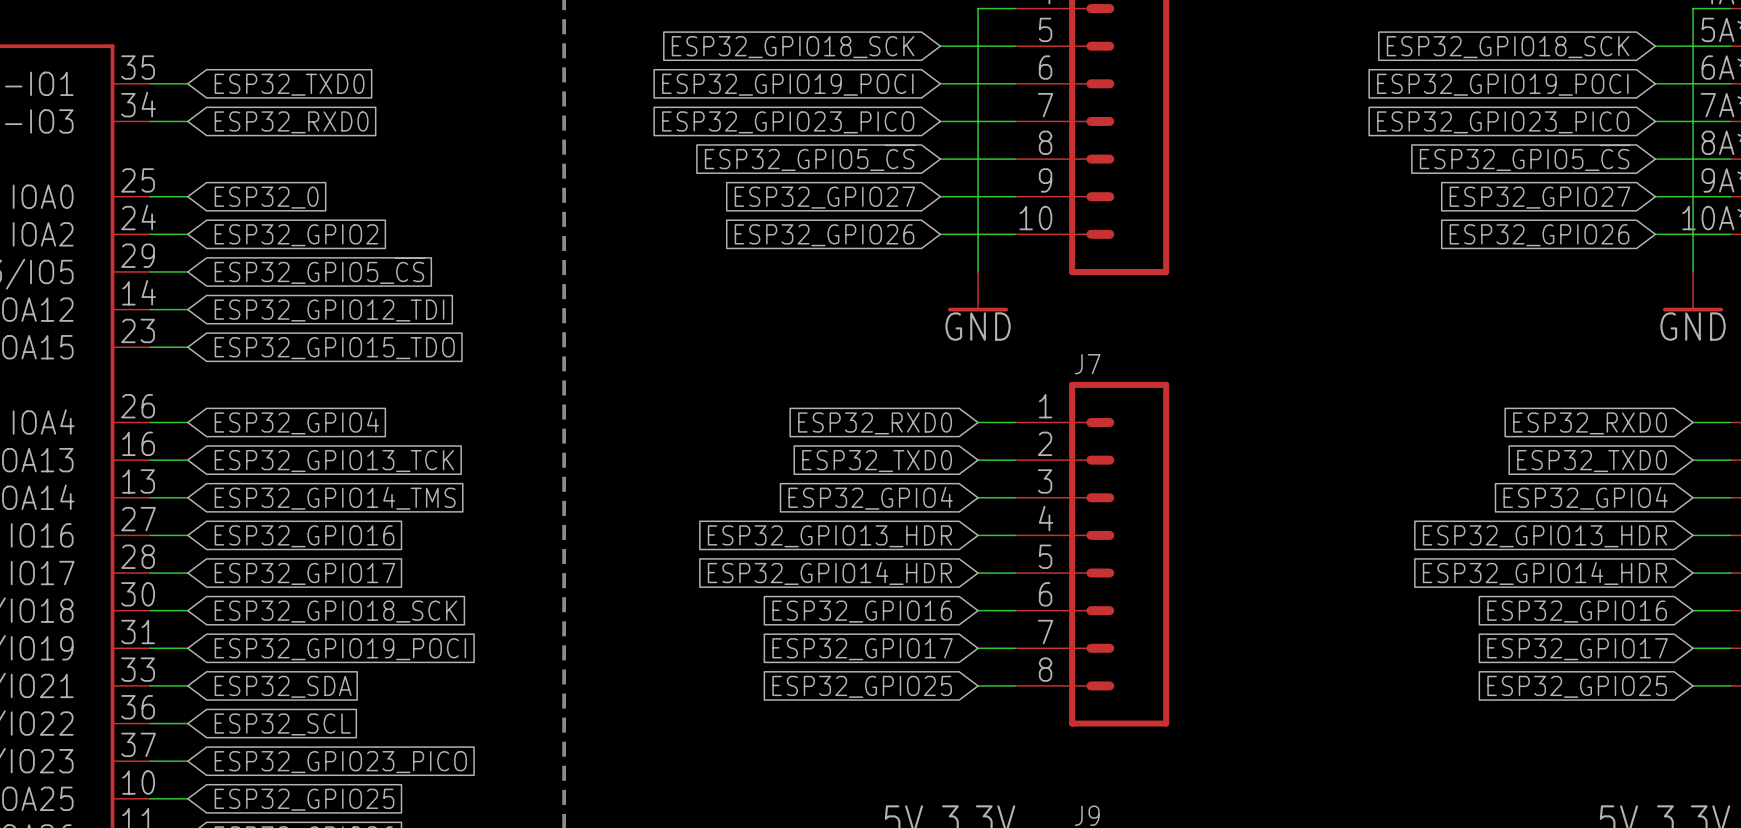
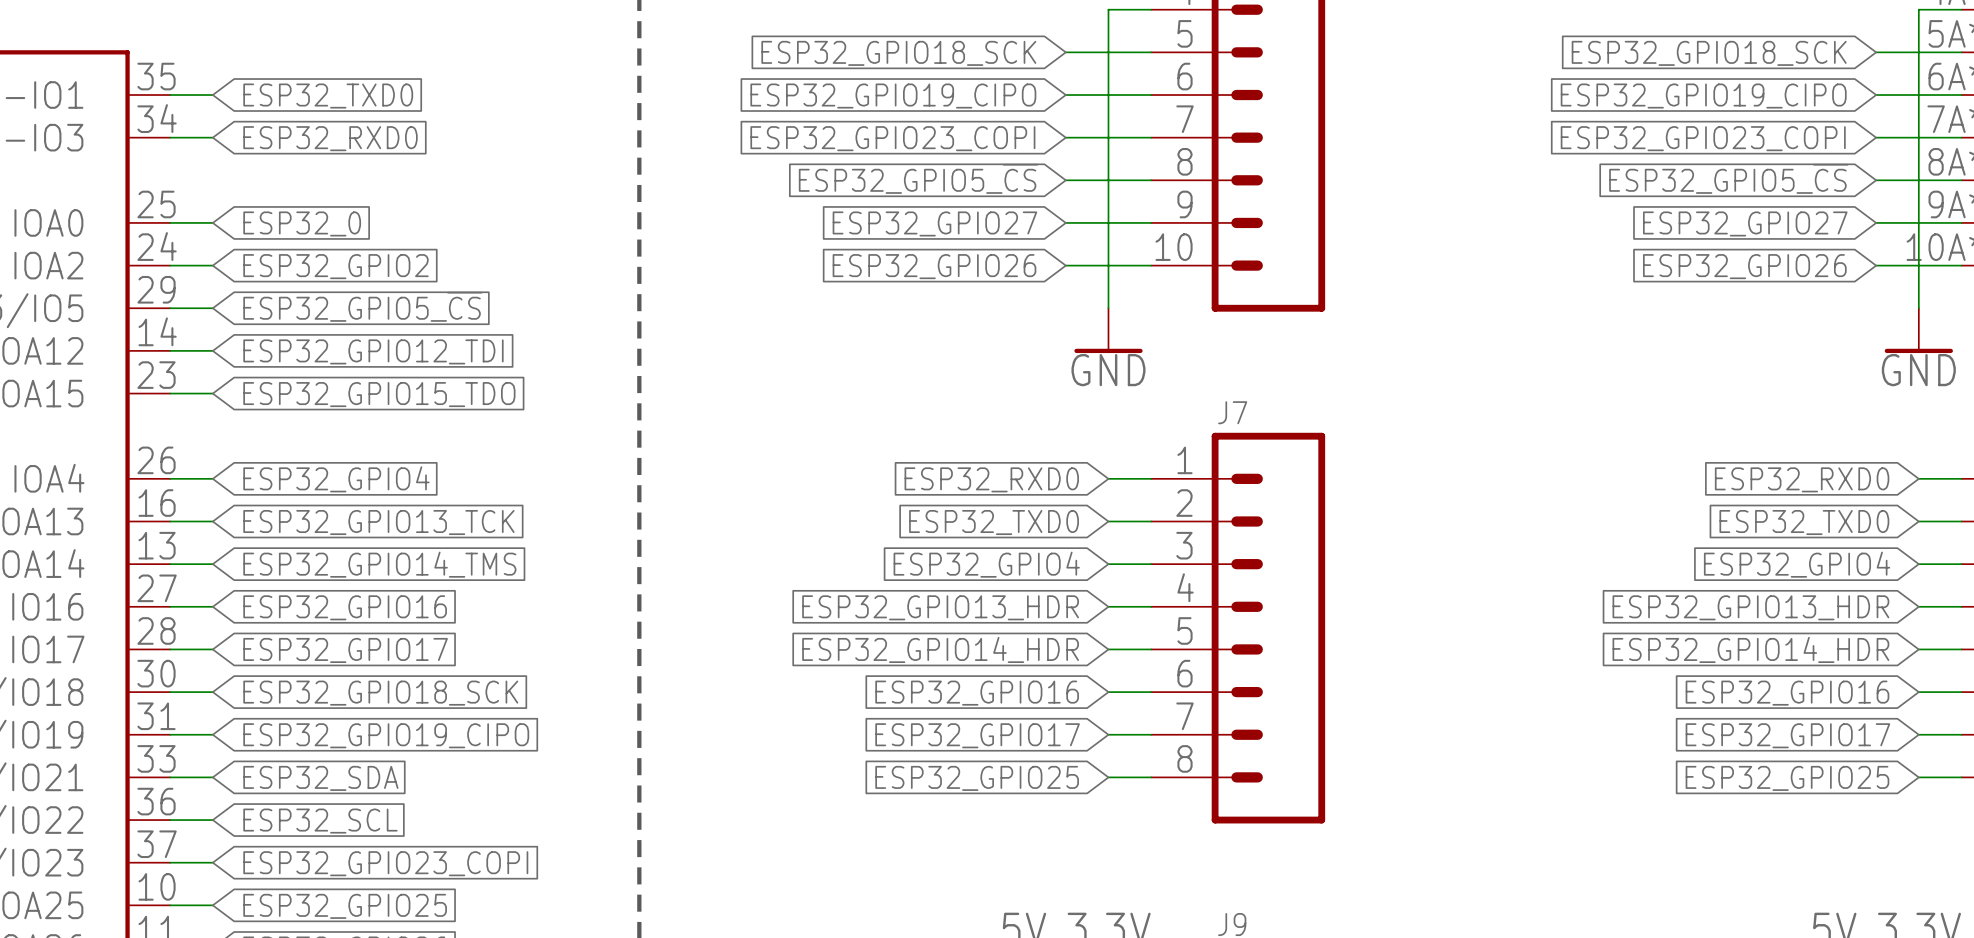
global label: ESP32_GPIO19_POCI (787, 84) -> ESP32_GPIO19_CIPO (893, 96)
global label: ESP32_GPIO19_POCI (1502, 84) -> ESP32_GPIO19_CIPO (1703, 96)
global label: ESP32_GPIO23_PICO (788, 122) -> ESP32_GPIO23_COPI (892, 138)
global label: ESP32_GPIO23_PICO (1503, 122) -> ESP32_GPIO23_COPI (1703, 138)
global label: ESP32_GPIO19_POCI (340, 649) -> ESP32_GPIO19_CIPO (386, 735)
global label: ESP32_GPIO23_PICO (340, 762) -> ESP32_GPIO23_COPI (385, 863)

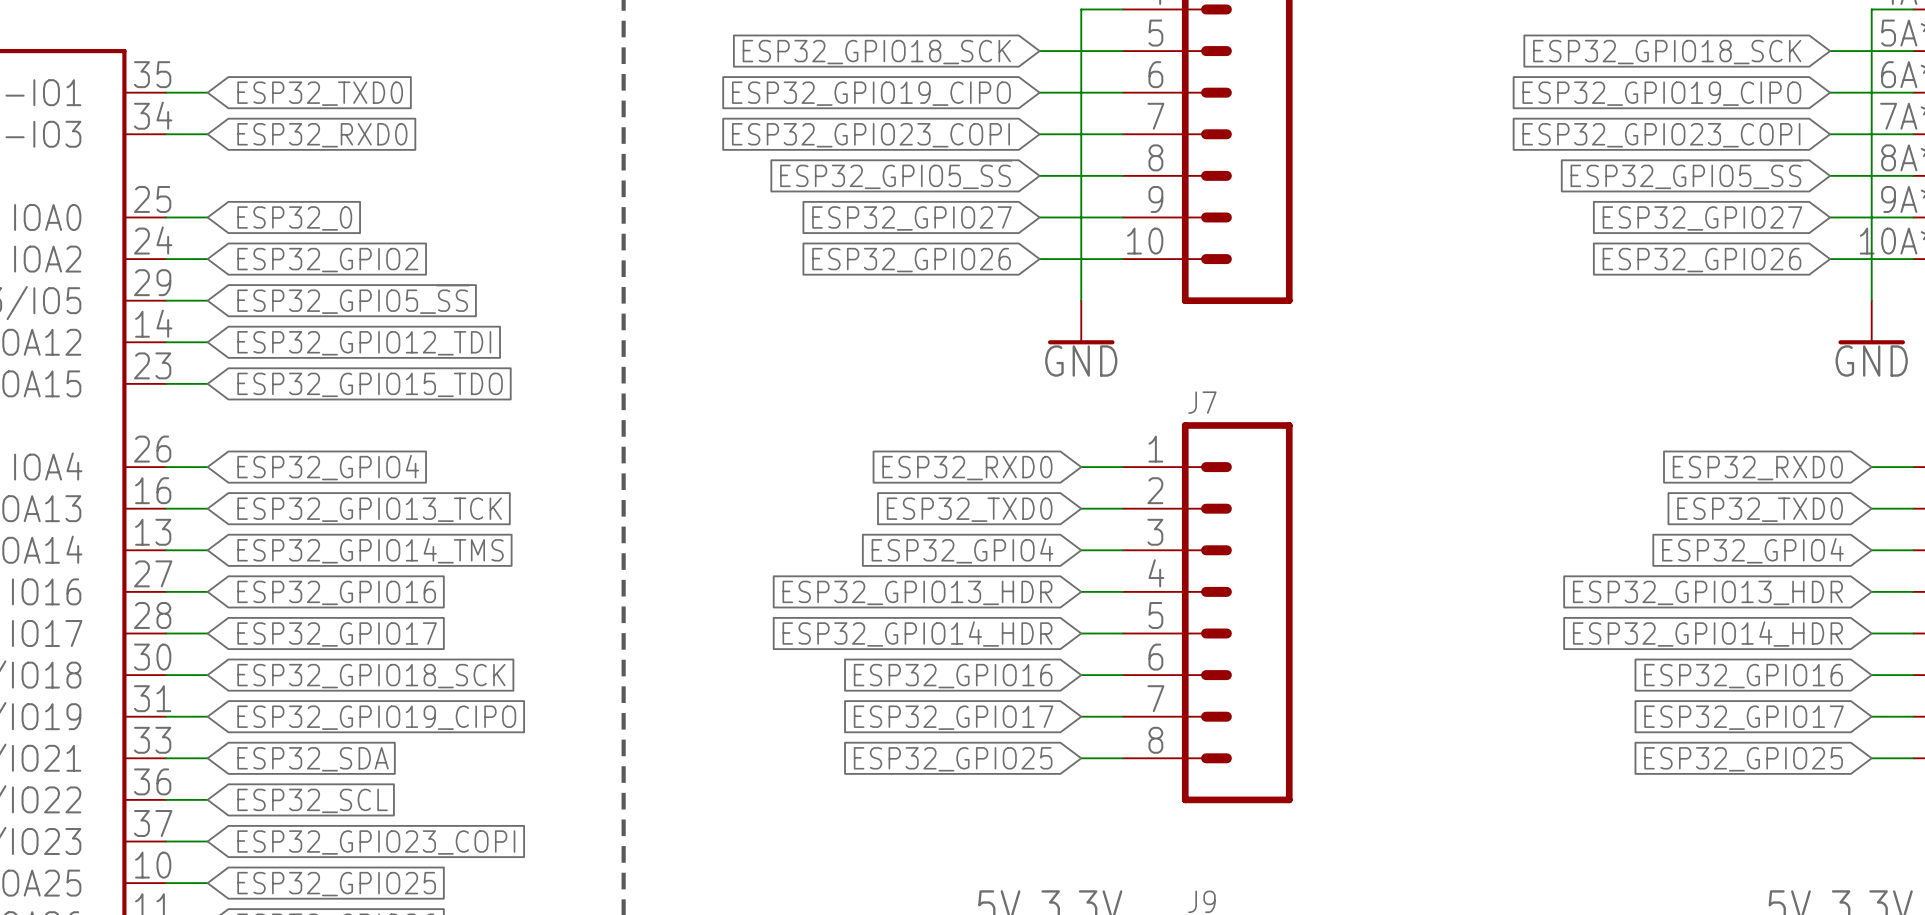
global label: ESP32_GPIO5_~{CS} (918, 178) -> ESP32_GPIO5_~{SS} (896, 174)
global label: ESP32_GPIO5_~{CS} (1728, 178) -> ESP32_GPIO5_~{SS} (1686, 174)
global label: ESP32_GPIO5_~{CS} (362, 306) -> ESP32_GPIO5_~{SS} (353, 299)

